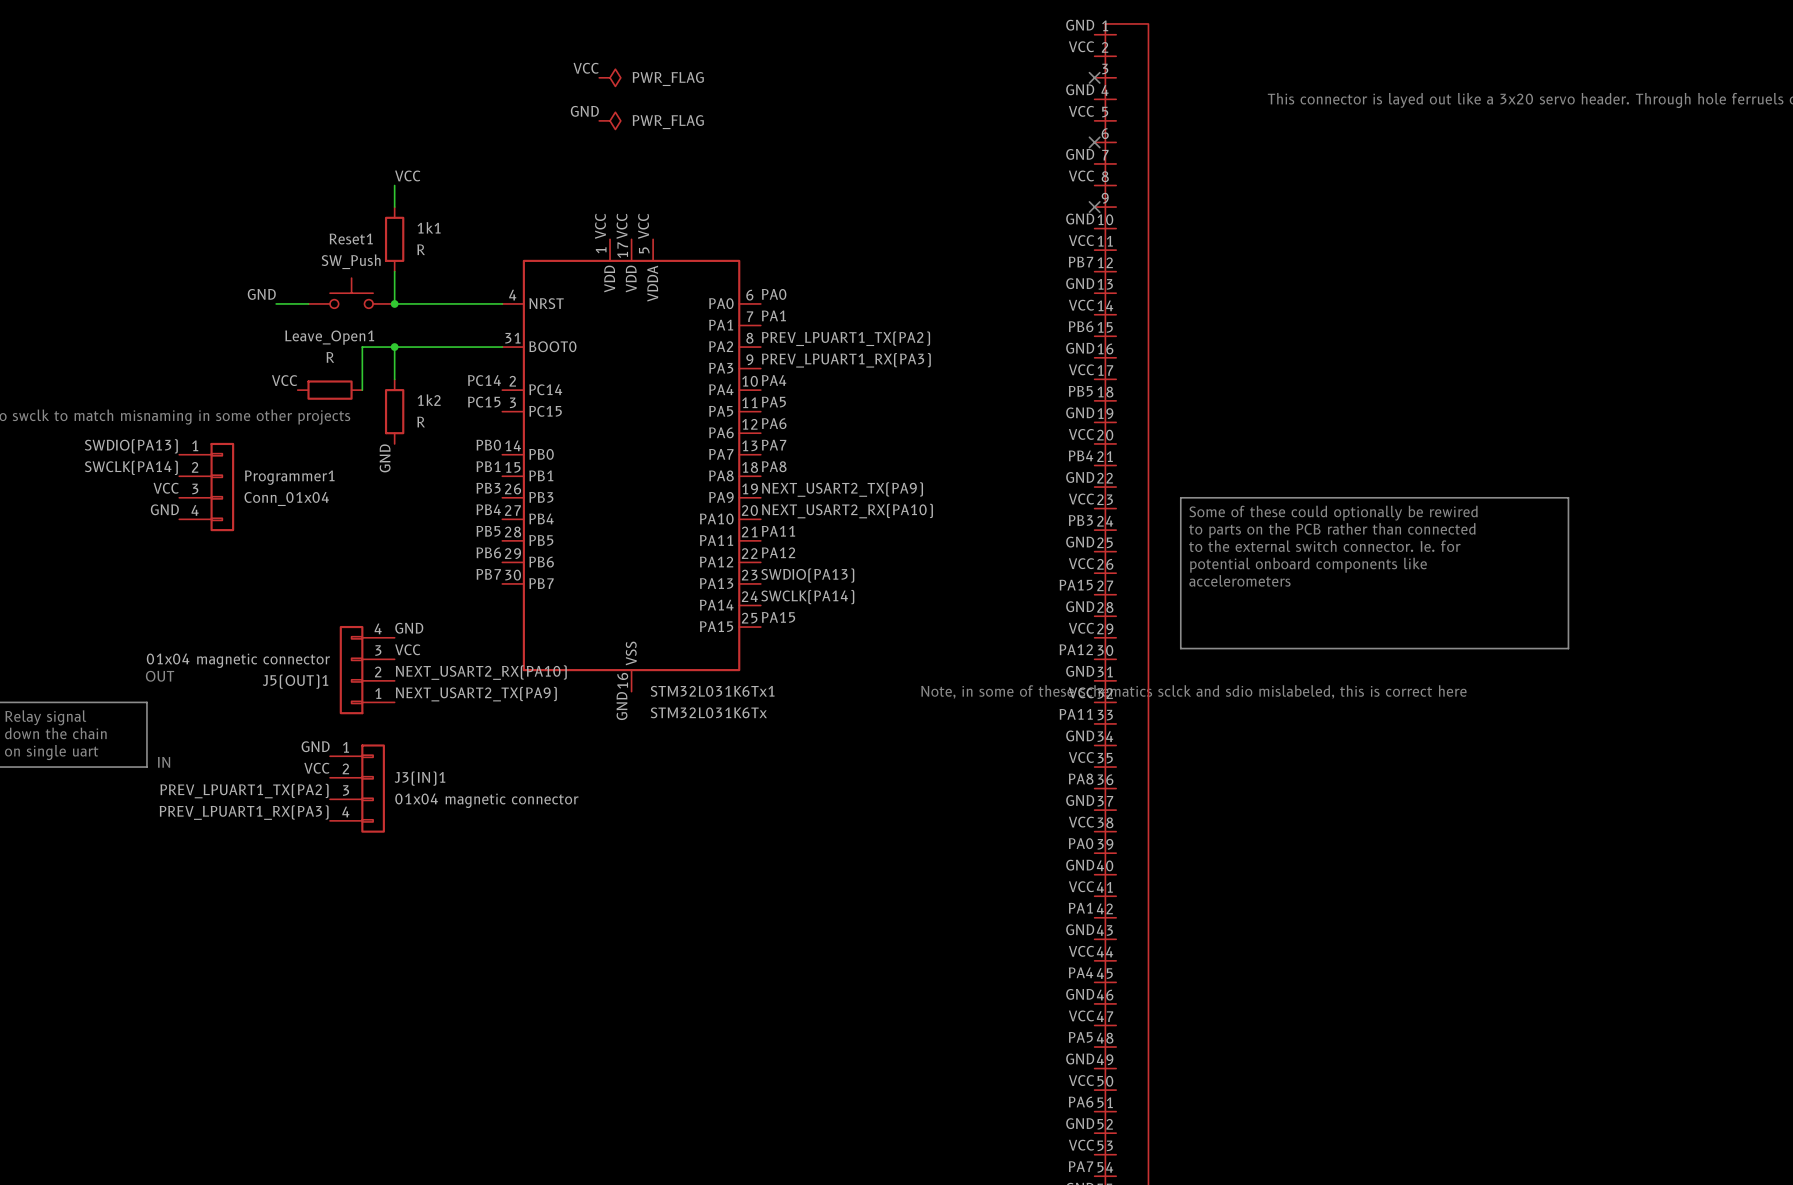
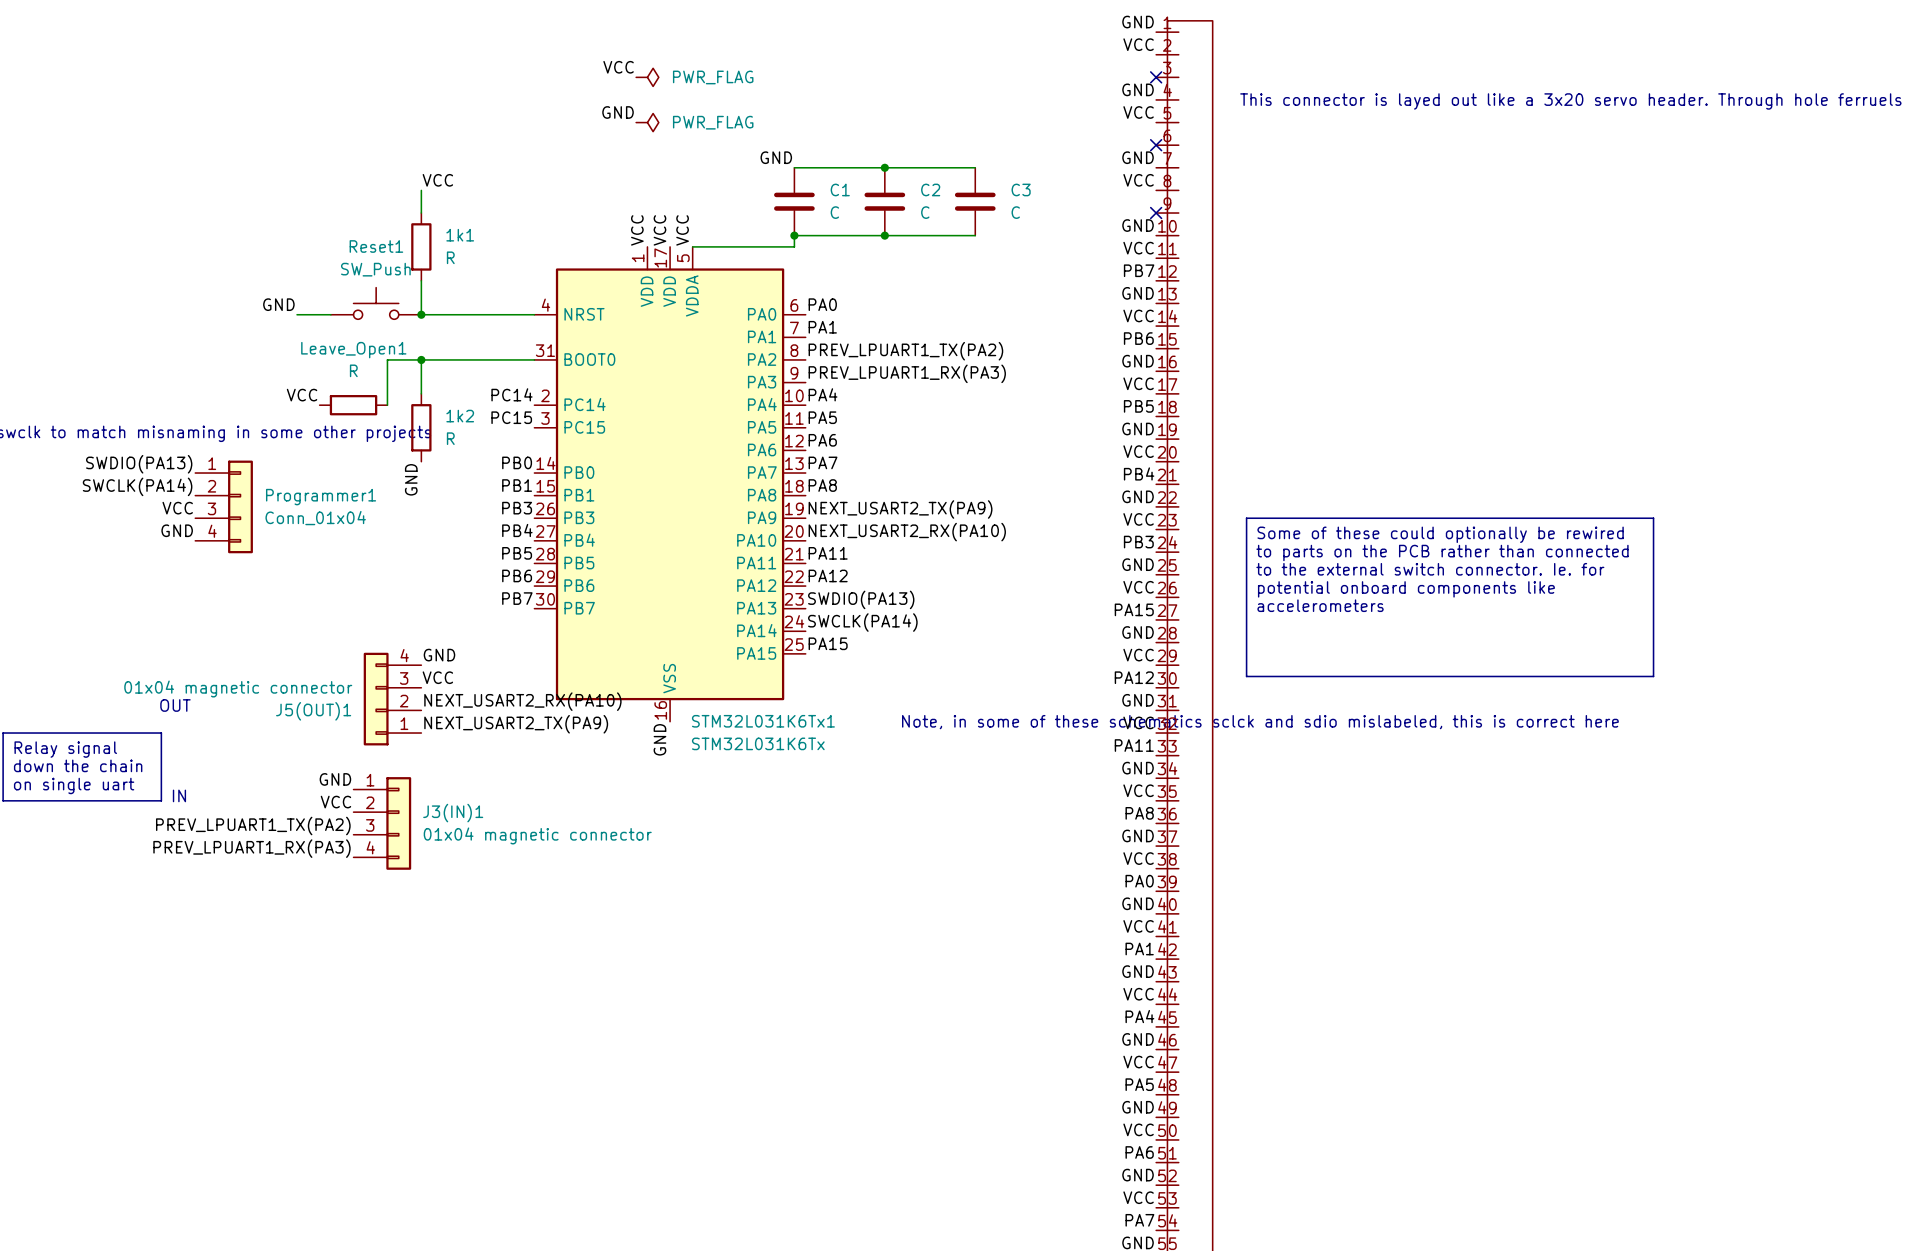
label: none -> GND (776, 157)
wire: none -> (794, 167) (975, 167)
junction: none -> (884, 167)
C1: none -> C (794, 201)
C2: none -> C (884, 201)
C3: none -> C (975, 201)
junction: none -> (794, 235)
junction: none -> (884, 235)
wire: none -> (975, 235) (794, 235) (794, 246) (692, 246)

